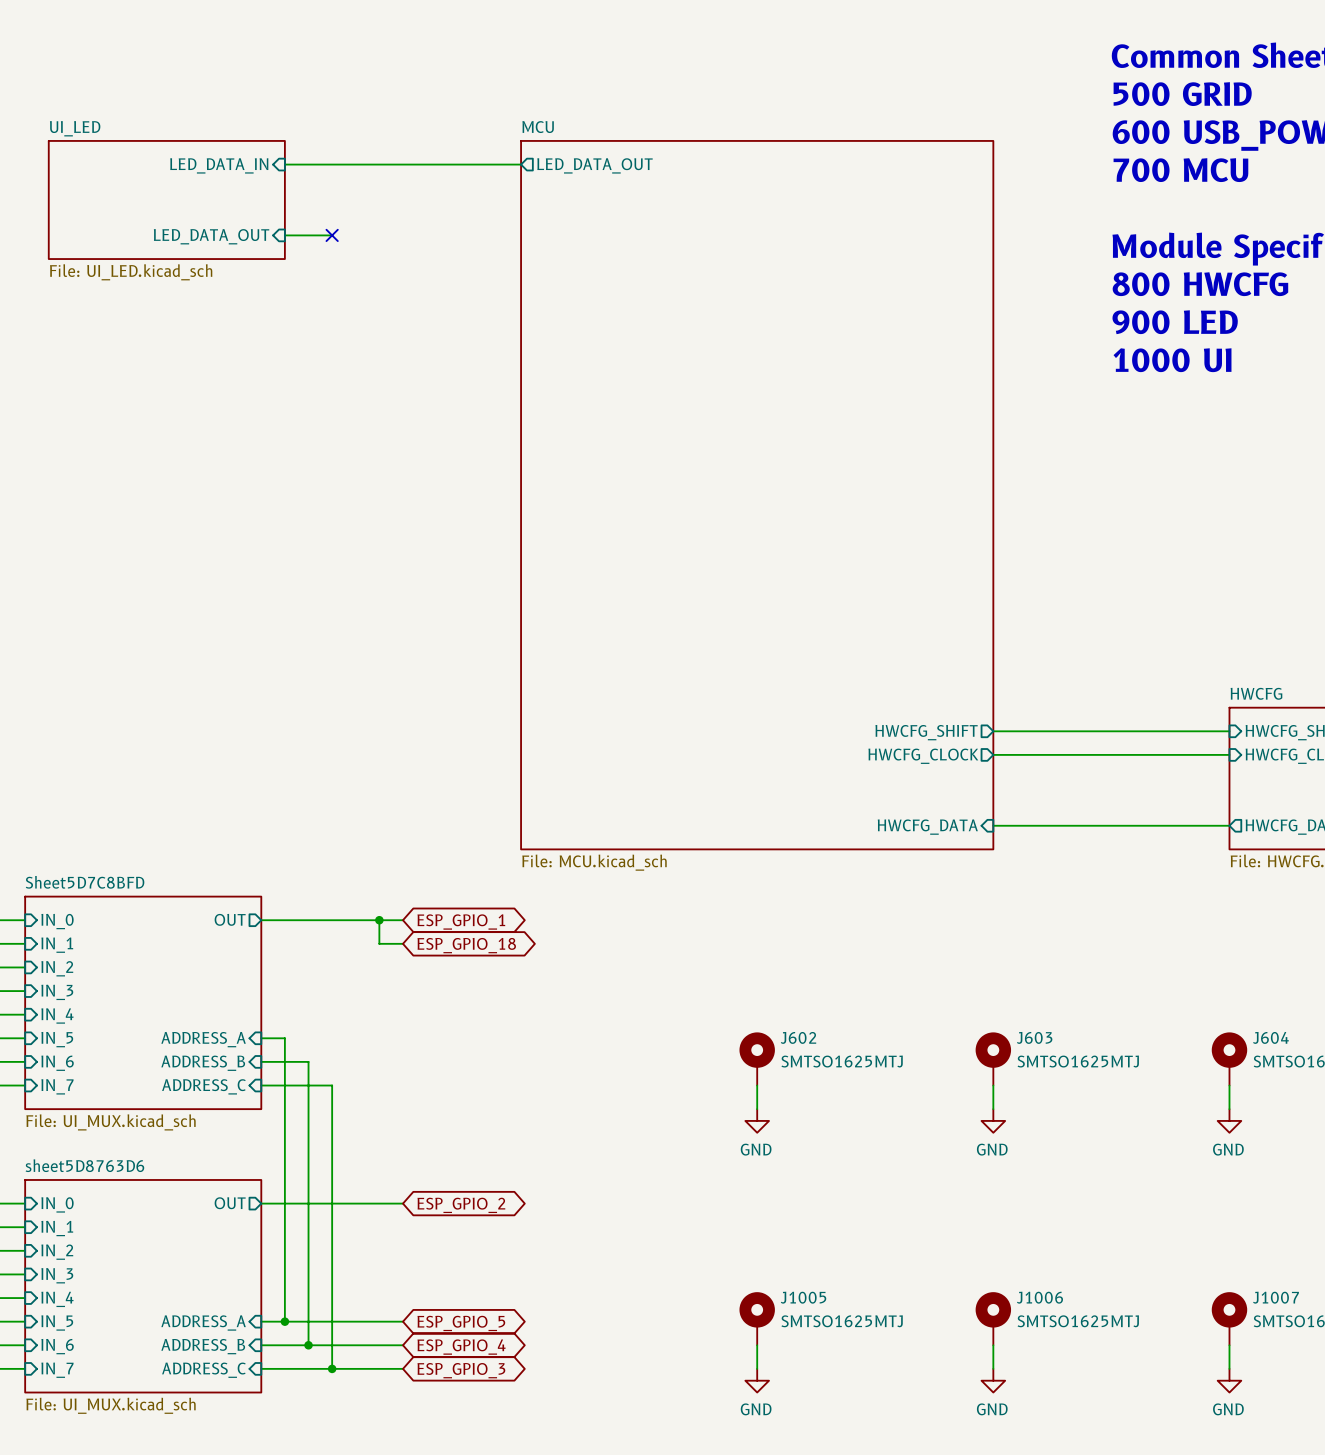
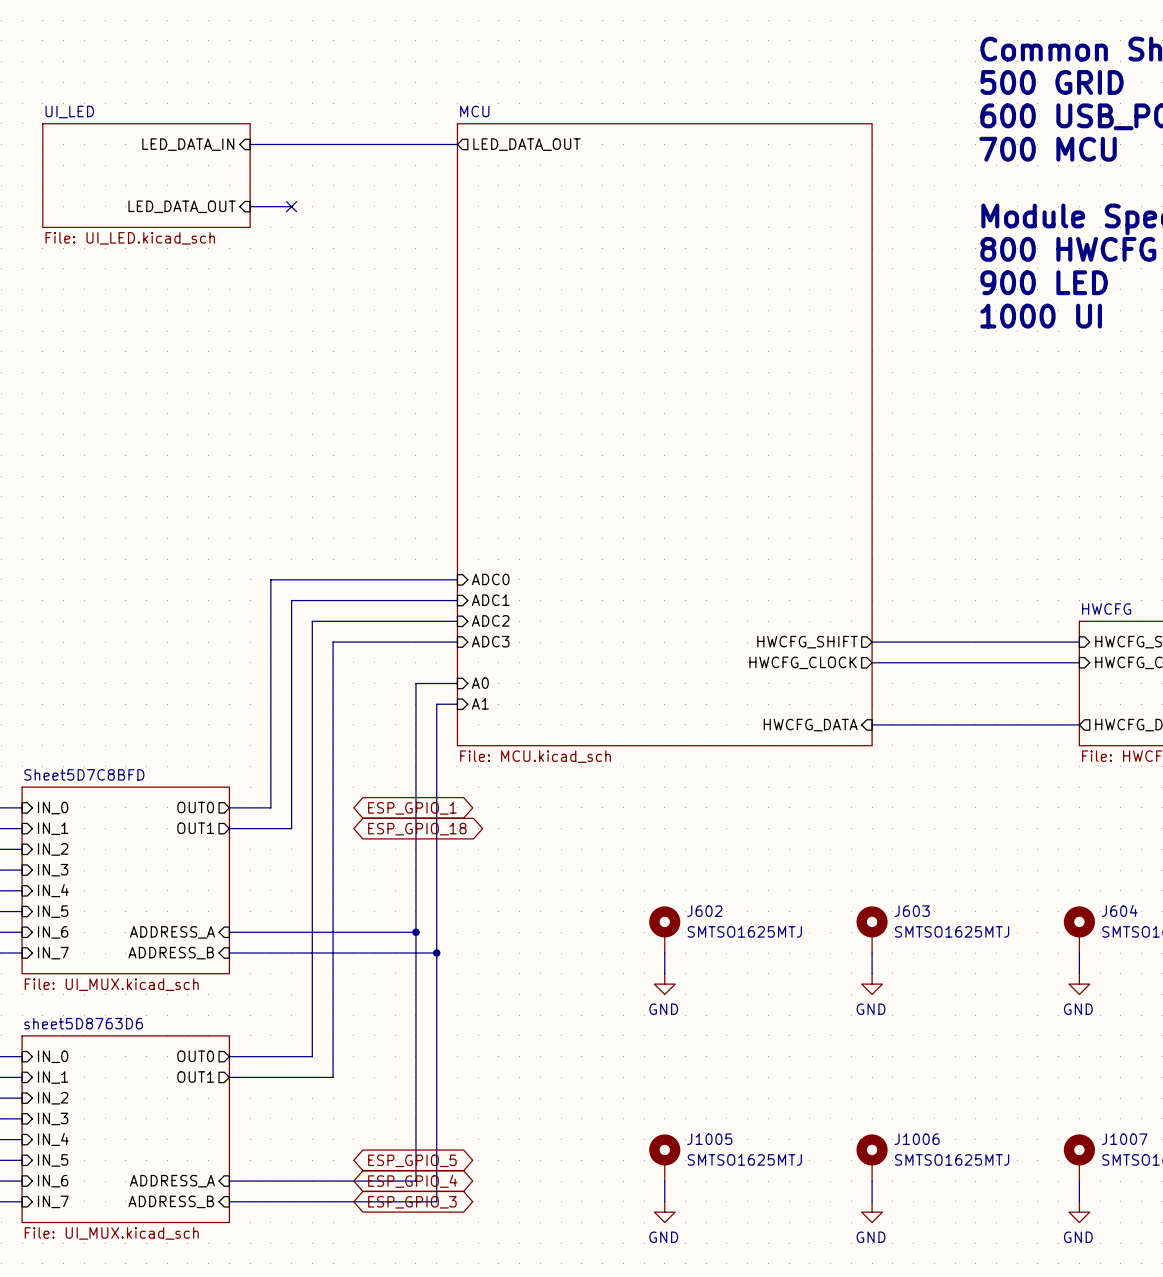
sheet pin: none -> ADC0 (490, 579)
sheet pin: none -> ADC1 (490, 600)
wire: none -> (457, 600) (291, 600) (291, 828) (229, 828)
sheet pin: none -> ADC2 (490, 620)
sheet pin: none -> ADC3 (490, 641)
wire: none -> (457, 642) (333, 642) (333, 807)
wire: none -> (457, 683) (415, 683) (415, 1181) (353, 1181)
sheet pin: none -> A0 (480, 683)
sheet pin: none -> A1 (480, 703)
wire: none -> (457, 704) (436, 704) (436, 1201) (353, 1201)
sheet pin: OUT (230, 919) -> OUT0 (195, 807)
wire: (308, 920) (402, 920) -> (270, 807) (270, 579) (457, 579)
junction: (379, 920) -> none
sheet pin: none -> OUT1 (195, 828)
wire: (379, 943) (402, 943) -> (333, 828) (333, 1077) (229, 1077)
wire: (261, 1038) (284, 1038) (284, 1321) -> none
sheet pin: ADDRESS_A (203, 1039) -> none
wire: (308, 1061) (308, 1345) -> (270, 932) (415, 932)
junction: none -> (415, 932)
sheet pin: ADDRESS_B (203, 1063) -> ADDRESS_A (172, 932)
wire: (332, 1085) (332, 1368) -> (291, 953) (436, 953)
junction: none -> (436, 953)
sheet pin: ADDRESS_C (203, 1086) -> ADDRESS_B (171, 953)
sheet pin: OUT (230, 1203) -> OUT0 (195, 1056)
wire: (355, 1203) (402, 1203) -> (312, 1056) (312, 621) (457, 621)
global label: ESP_GPIO_2 (461, 1205) -> none
sheet pin: none -> OUT1 (195, 1077)
wire: (261, 1321) (402, 1321) -> none
junction: (284, 1321) -> none
sheet pin: ADDRESS_A (203, 1322) -> none
junction: (308, 1345) -> none
sheet pin: ADDRESS_B (203, 1346) -> ADDRESS_A (172, 1181)
junction: (332, 1368) -> none
sheet pin: ADDRESS_C (203, 1370) -> ADDRESS_B (171, 1201)

